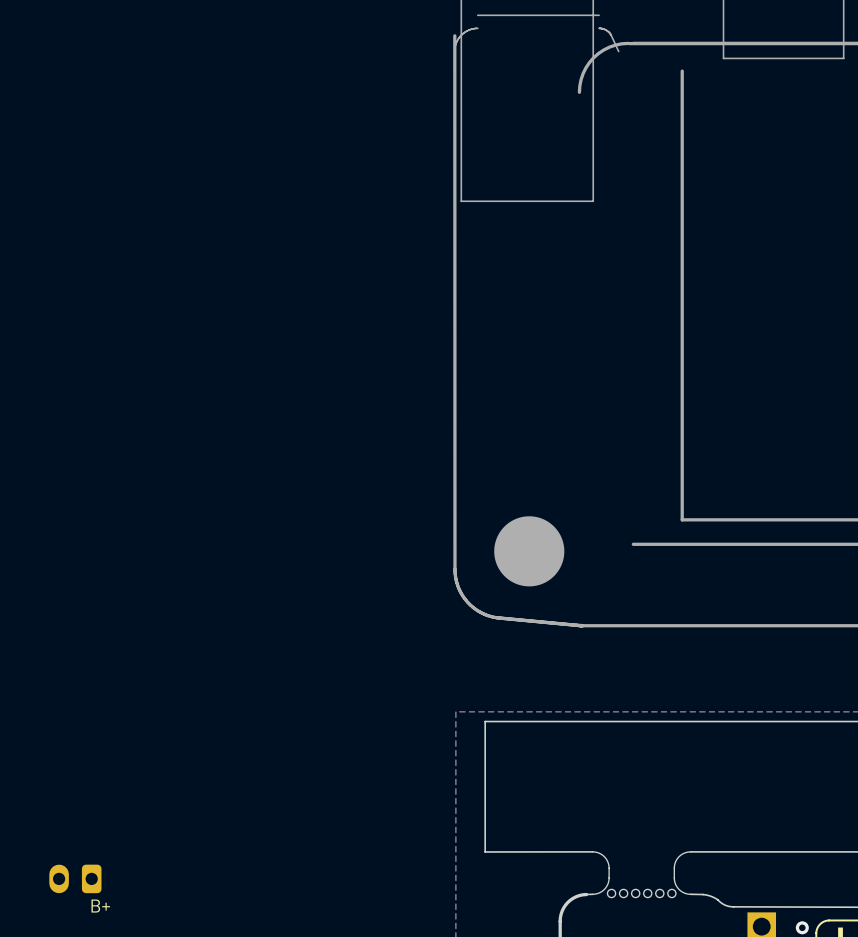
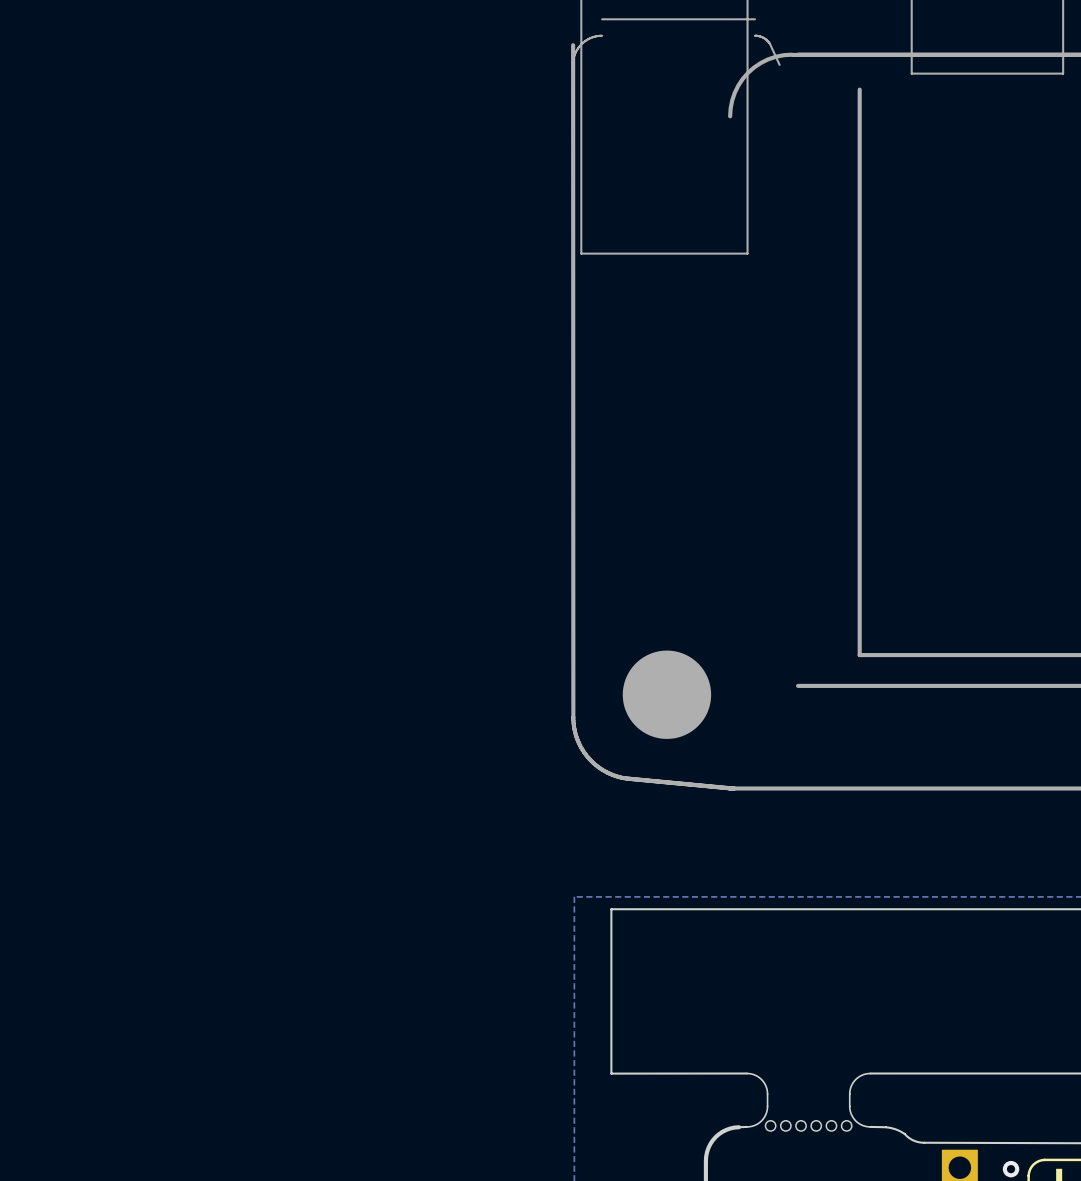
part: (75, 878) -> none
text: B+ (100, 906) -> none

